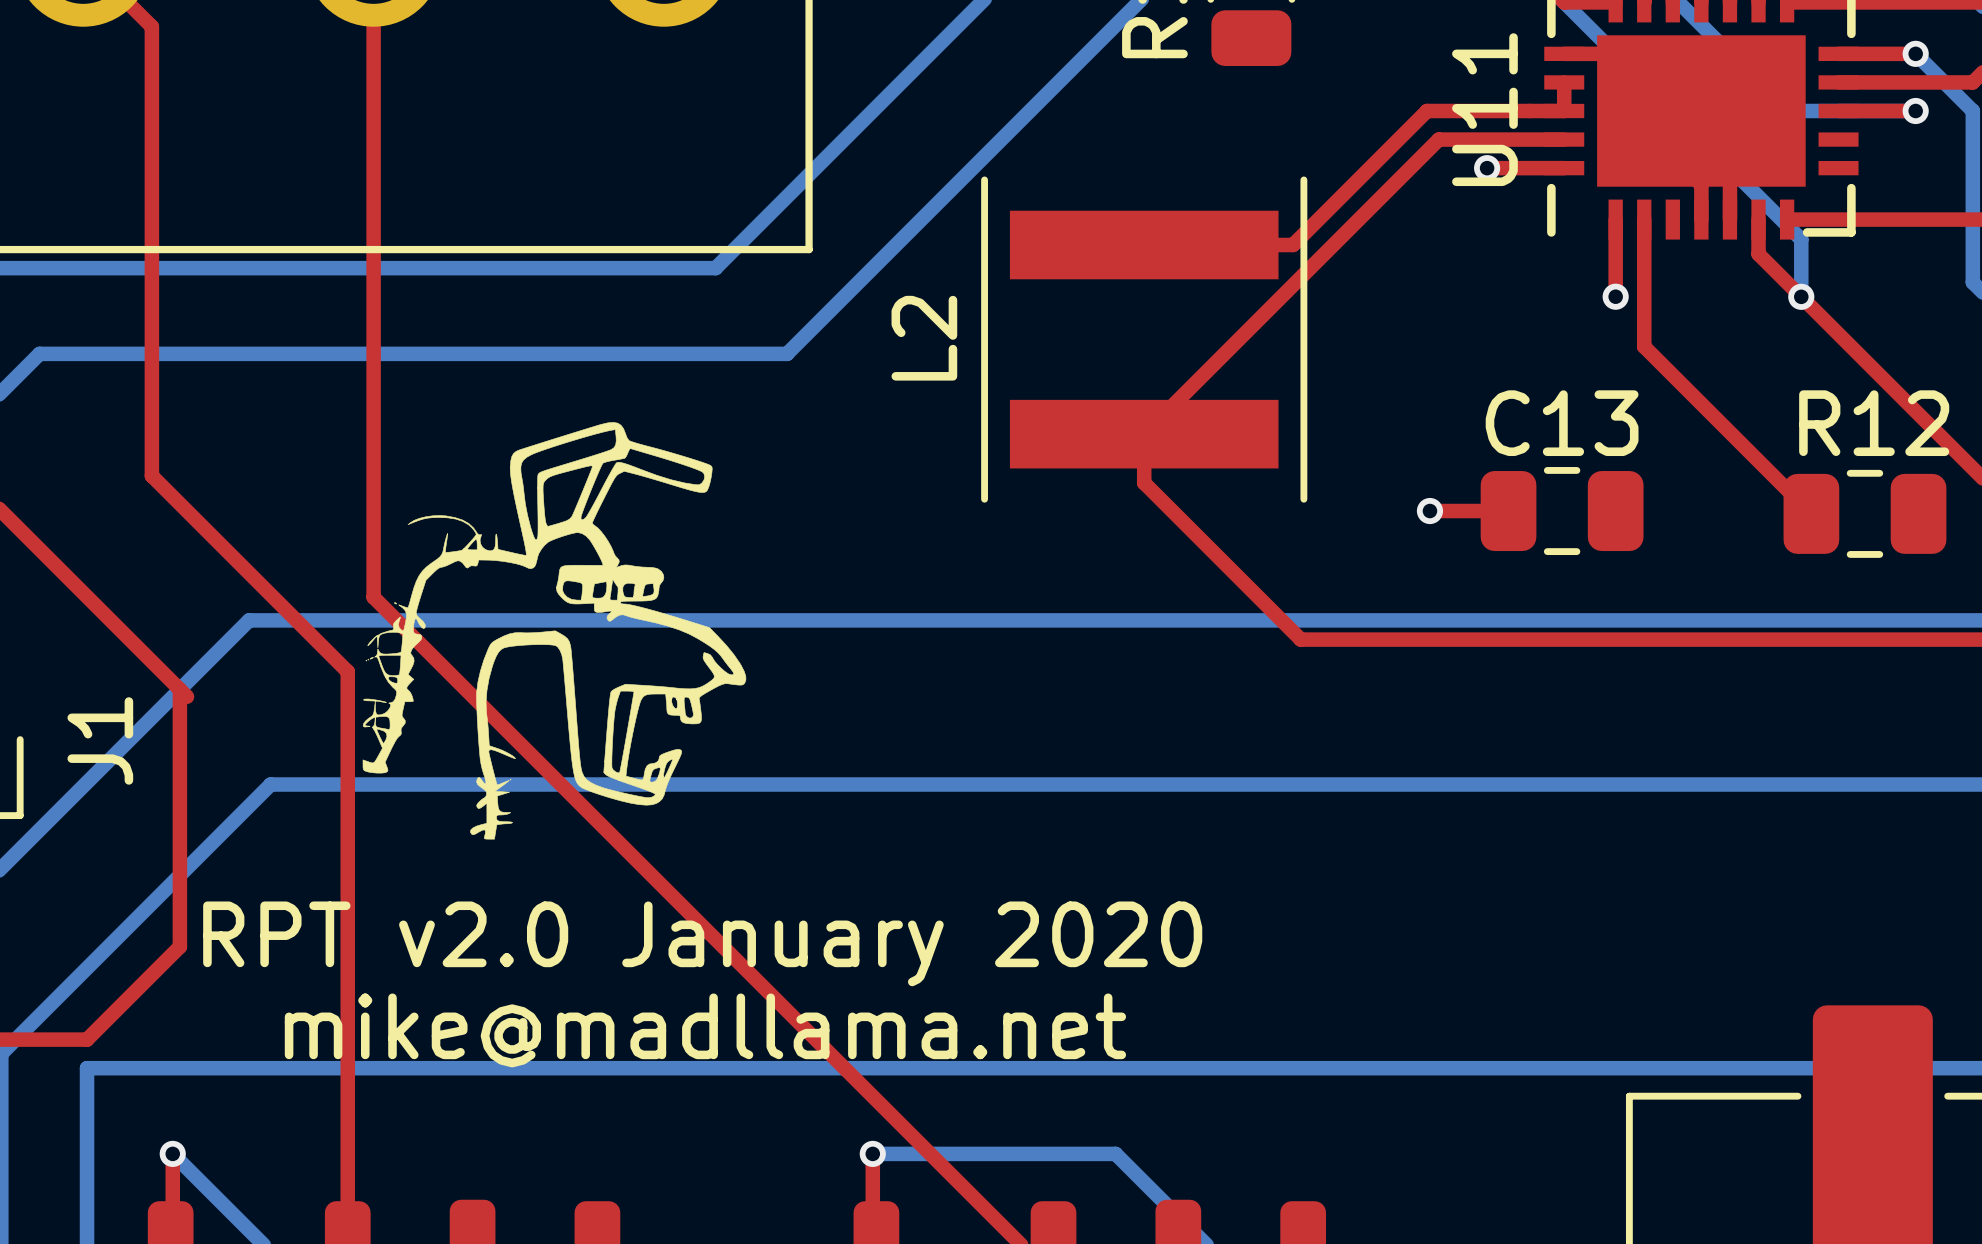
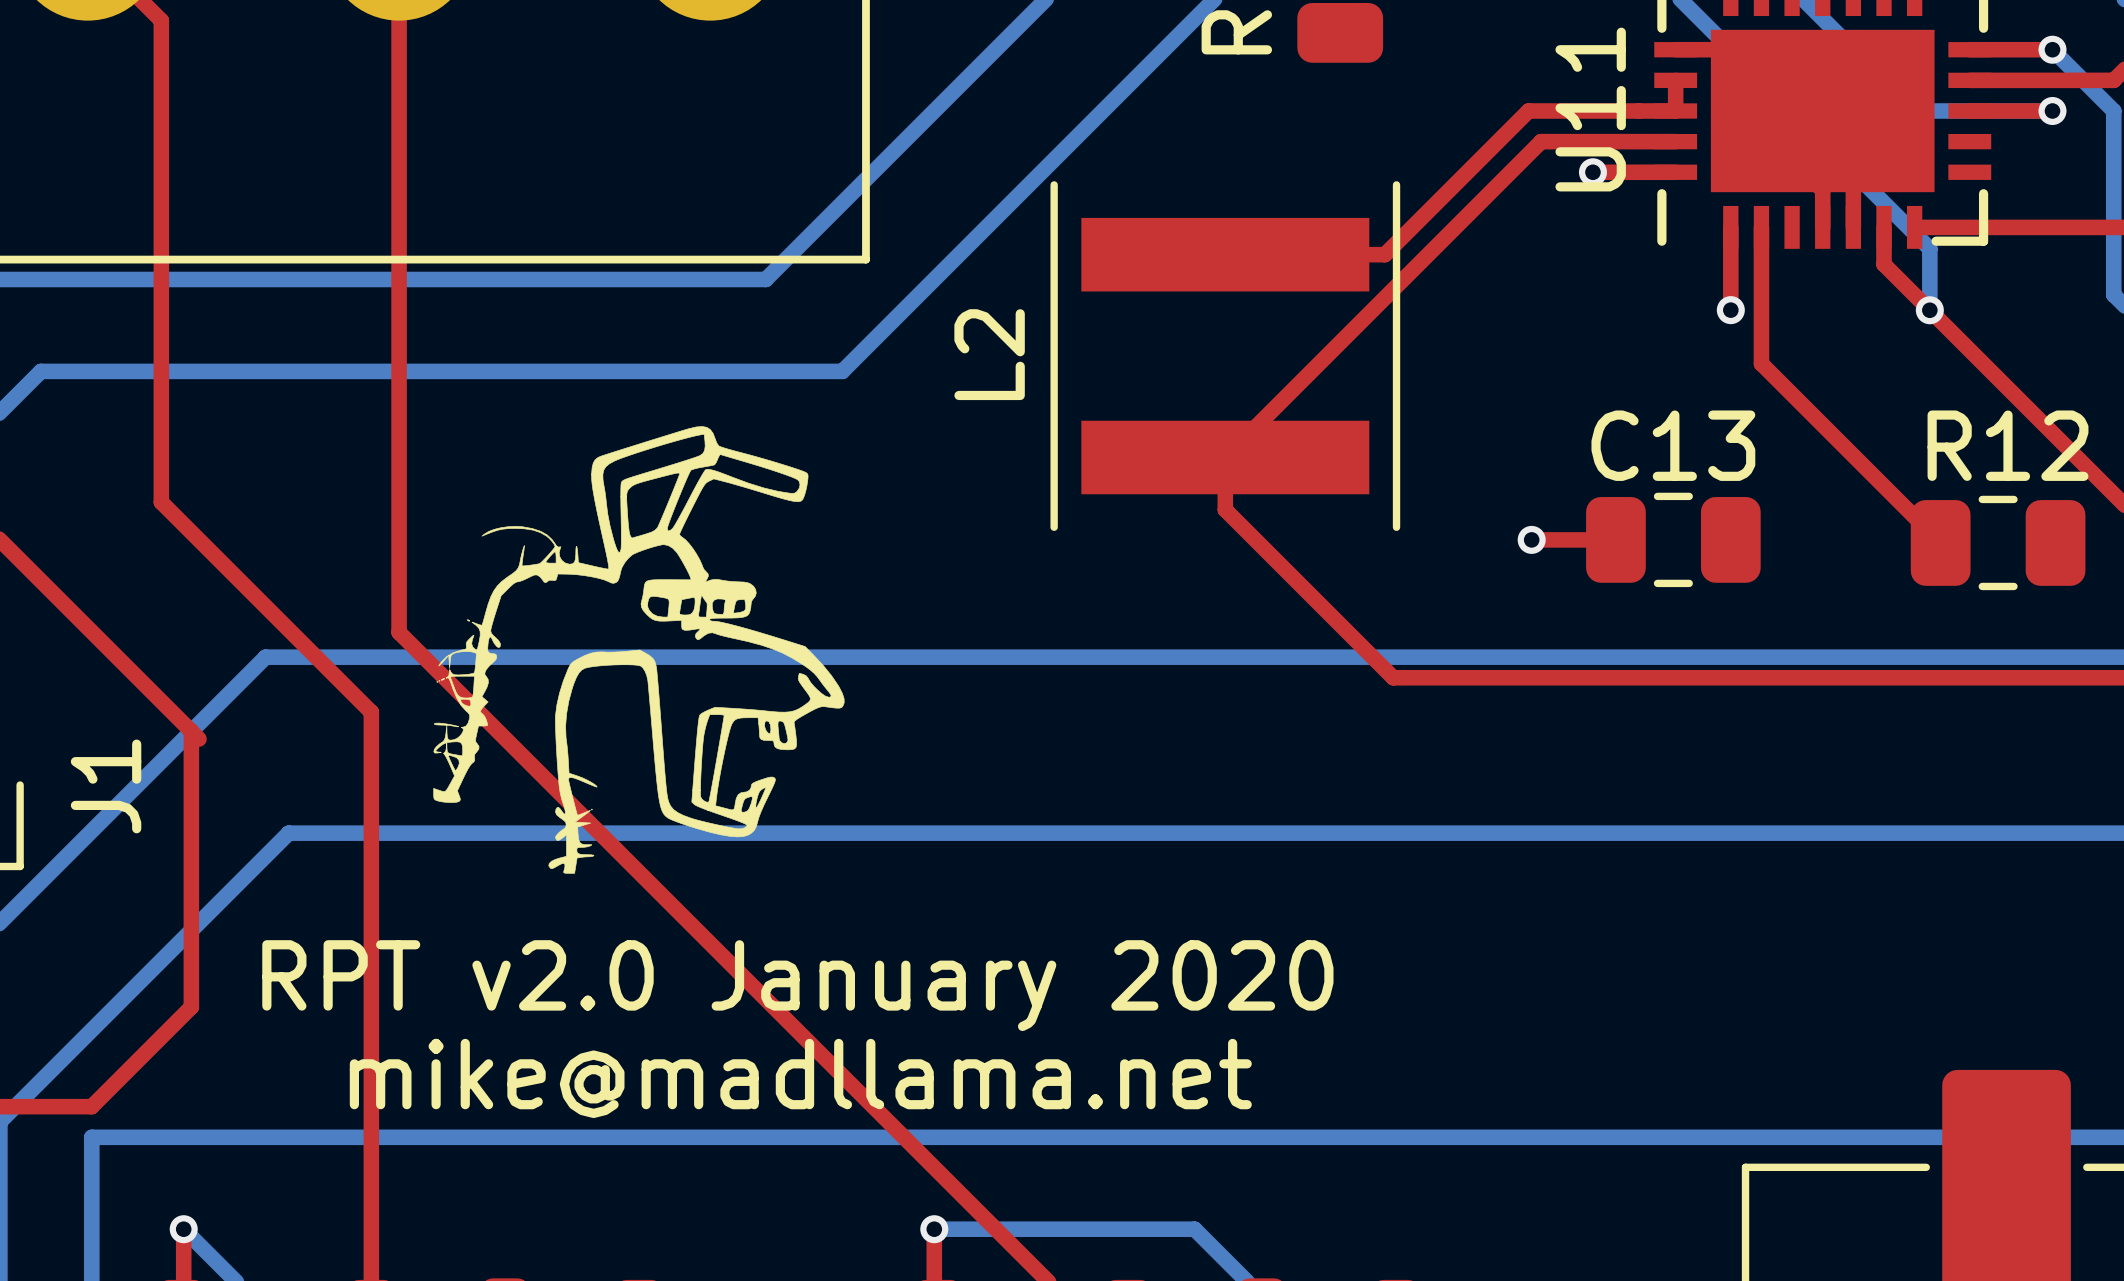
drawing position: (554, 630) -> (638, 649)
text position: RPT v2.0 January 2020 (702, 943) -> RPT v2.0 January 2020 (797, 985)
text position: mike@madllama.net (705, 1030) -> mike@madllama.net (800, 1078)

